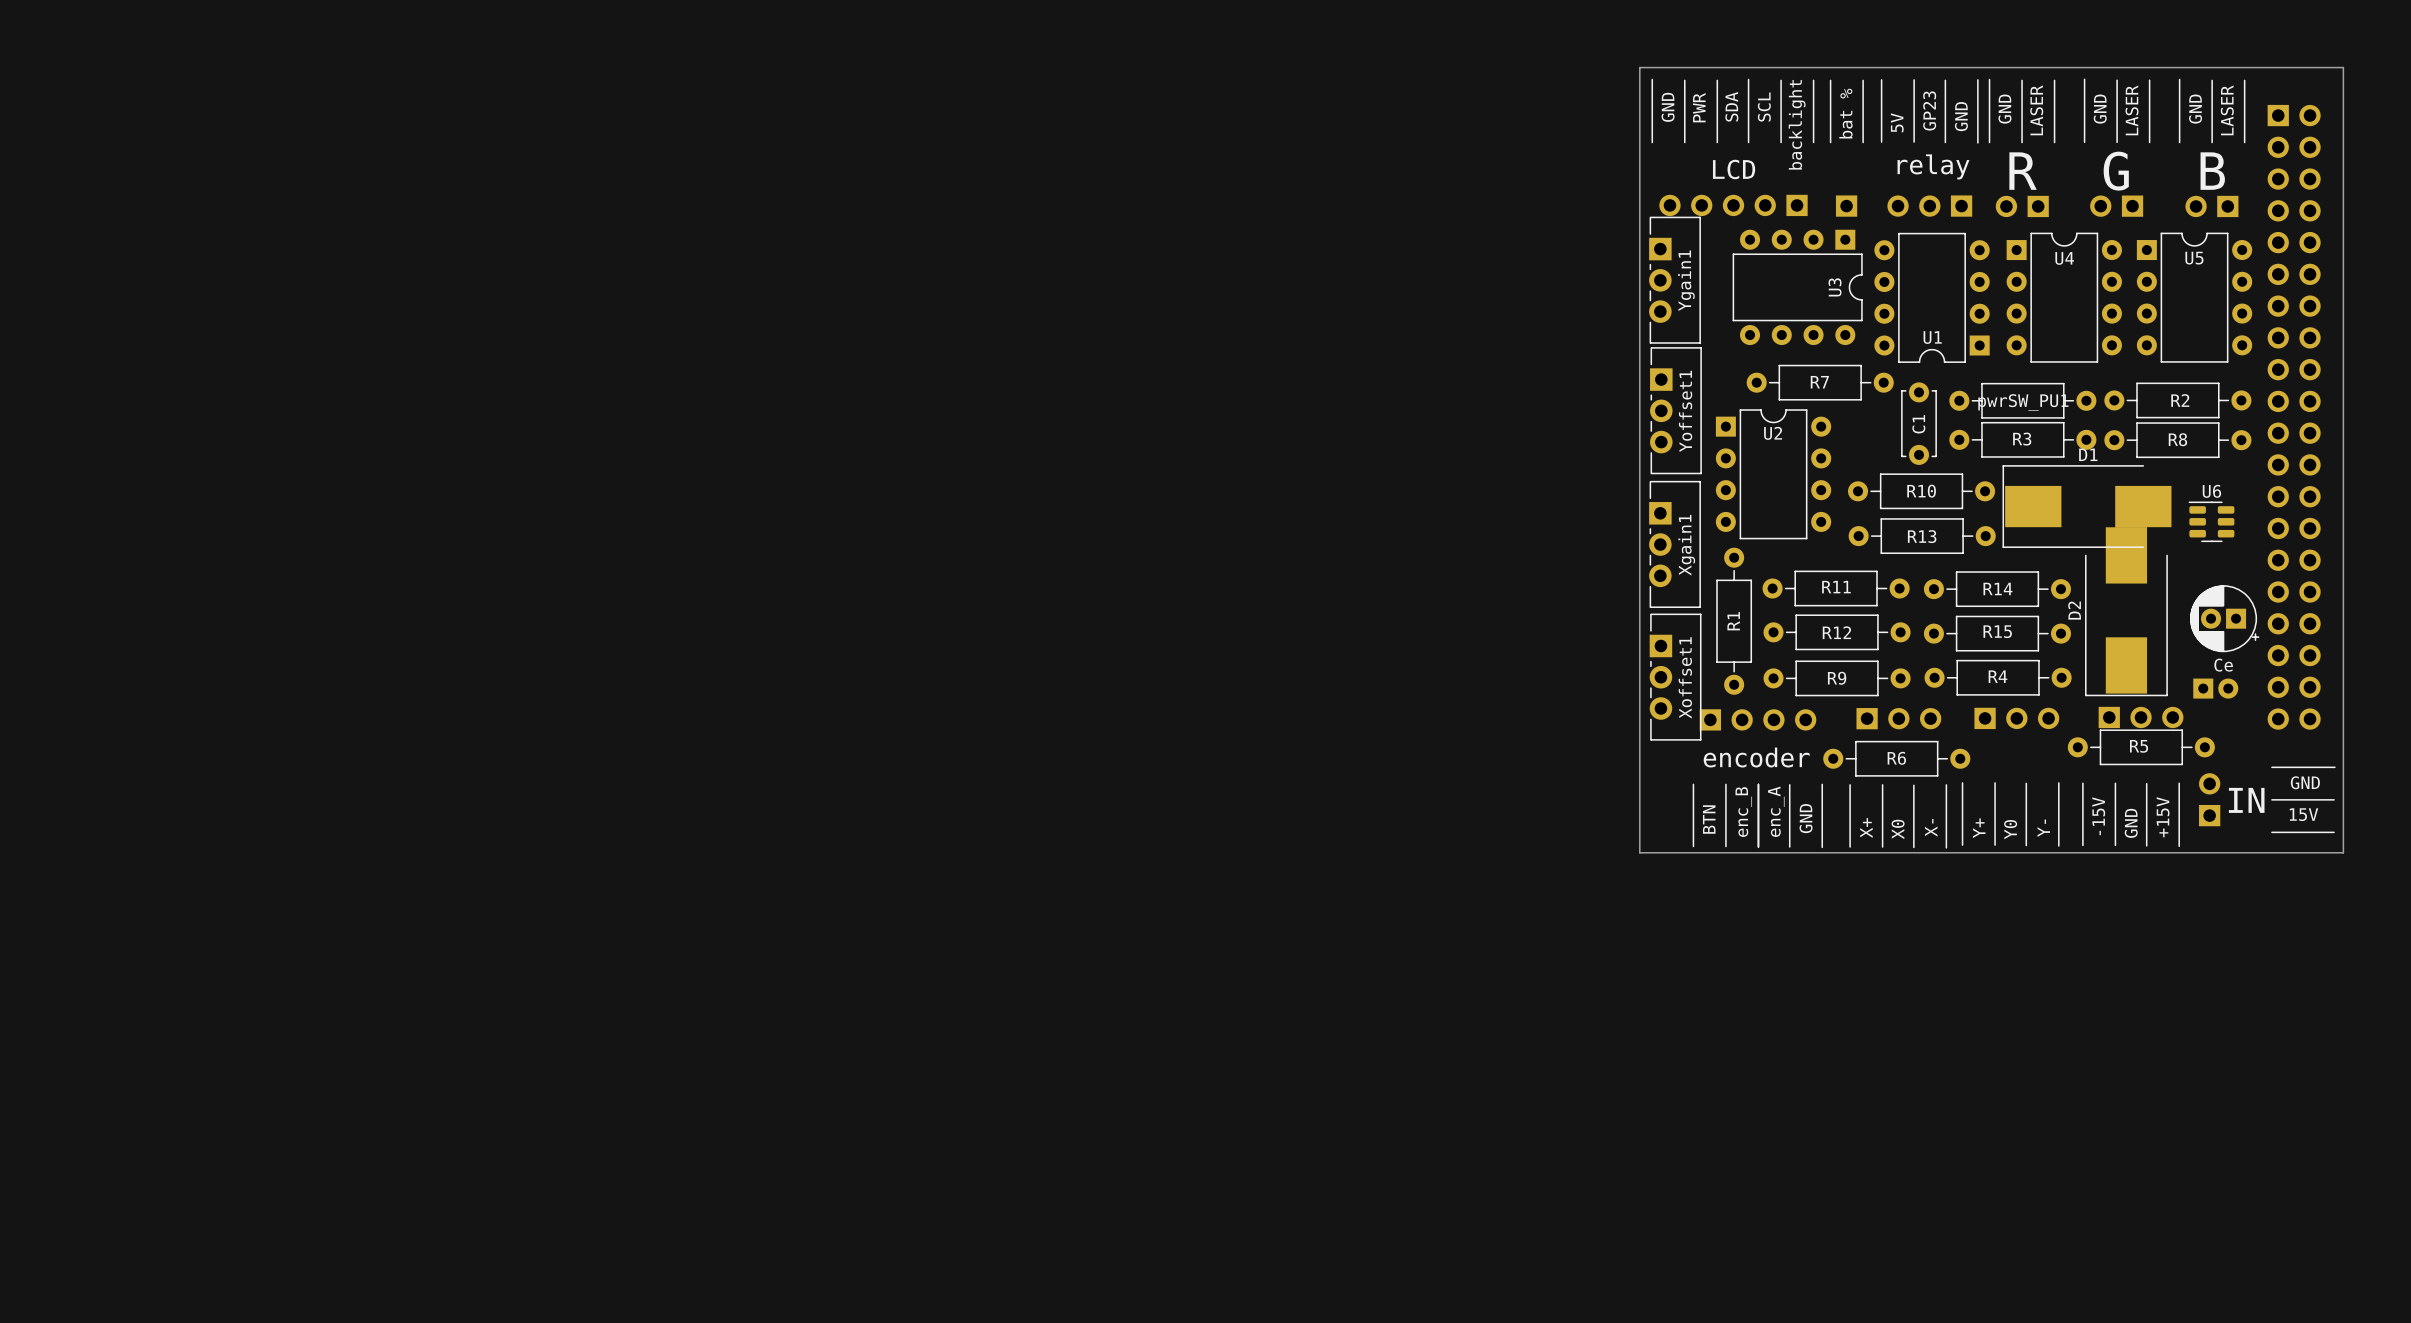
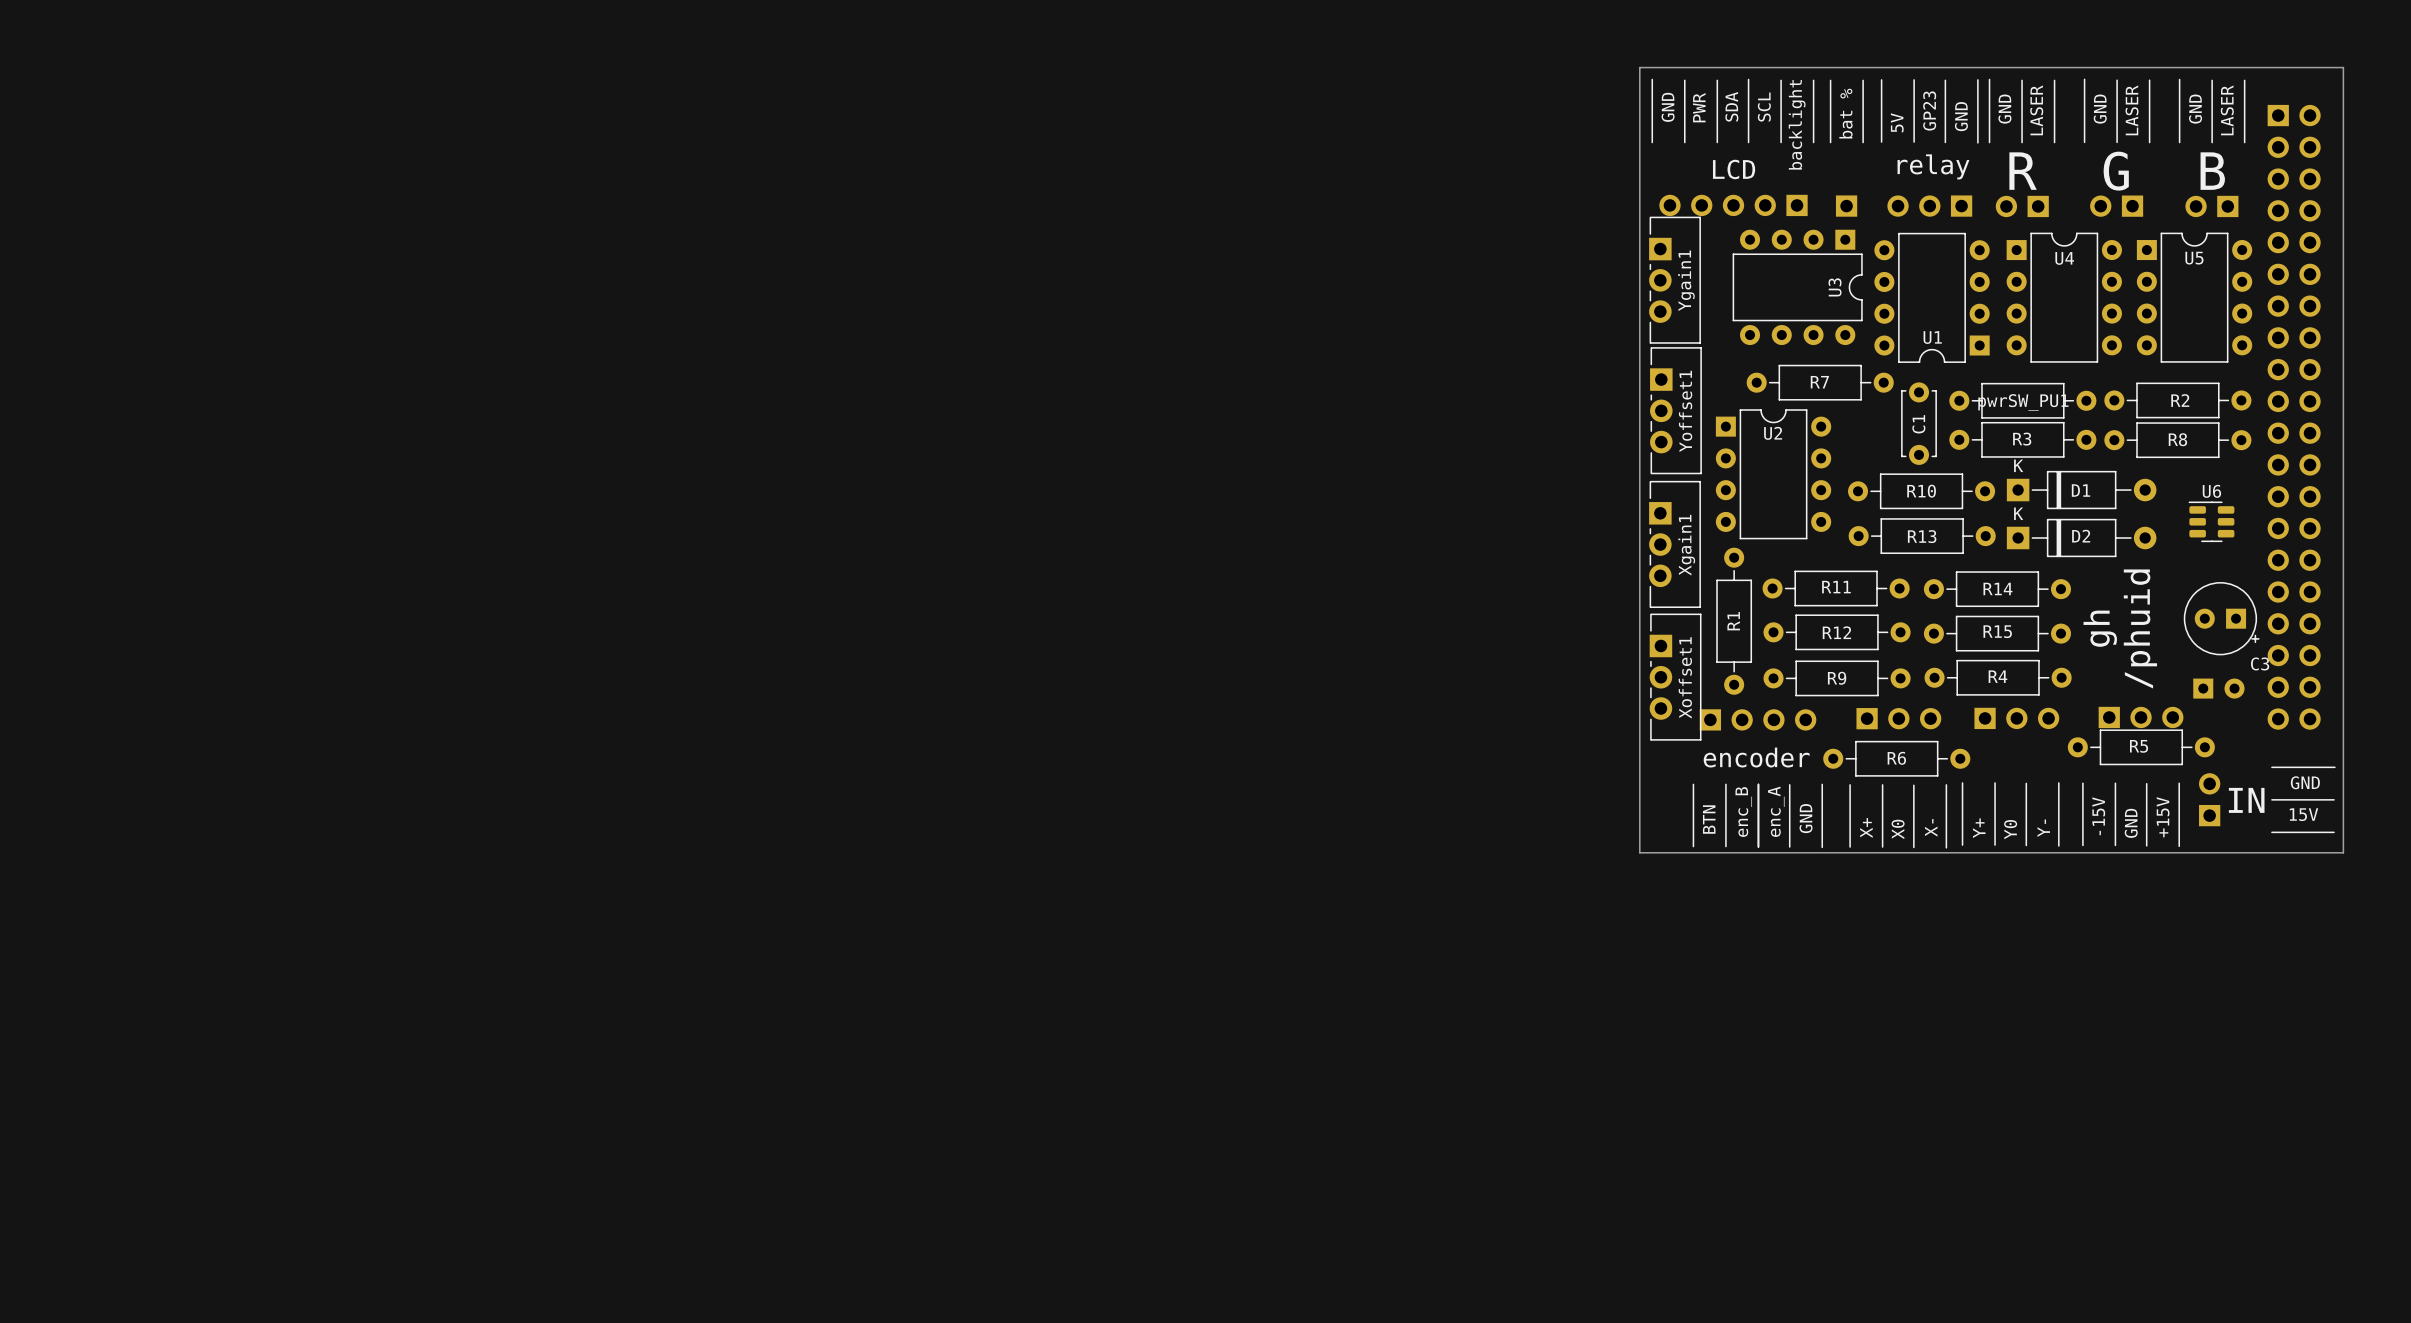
D1 name position: D1 (2088, 454) -> D1 (2081, 490)
D1 footprint: [2002, 465, 2172, 548] -> [2006, 470, 2157, 510]
D2 footprint: [2085, 527, 2168, 697] -> [2006, 518, 2157, 558]
D2 name position: D2 (2074, 610) -> D2 (2081, 536)
C3: none -> (2221, 618)
Ce: (2224, 618) -> none
text: none -> gh (2100, 628)
text: none -> /phuid (2140, 628)
part footprint: [2193, 678, 2239, 699] -> [2193, 678, 2245, 699]

